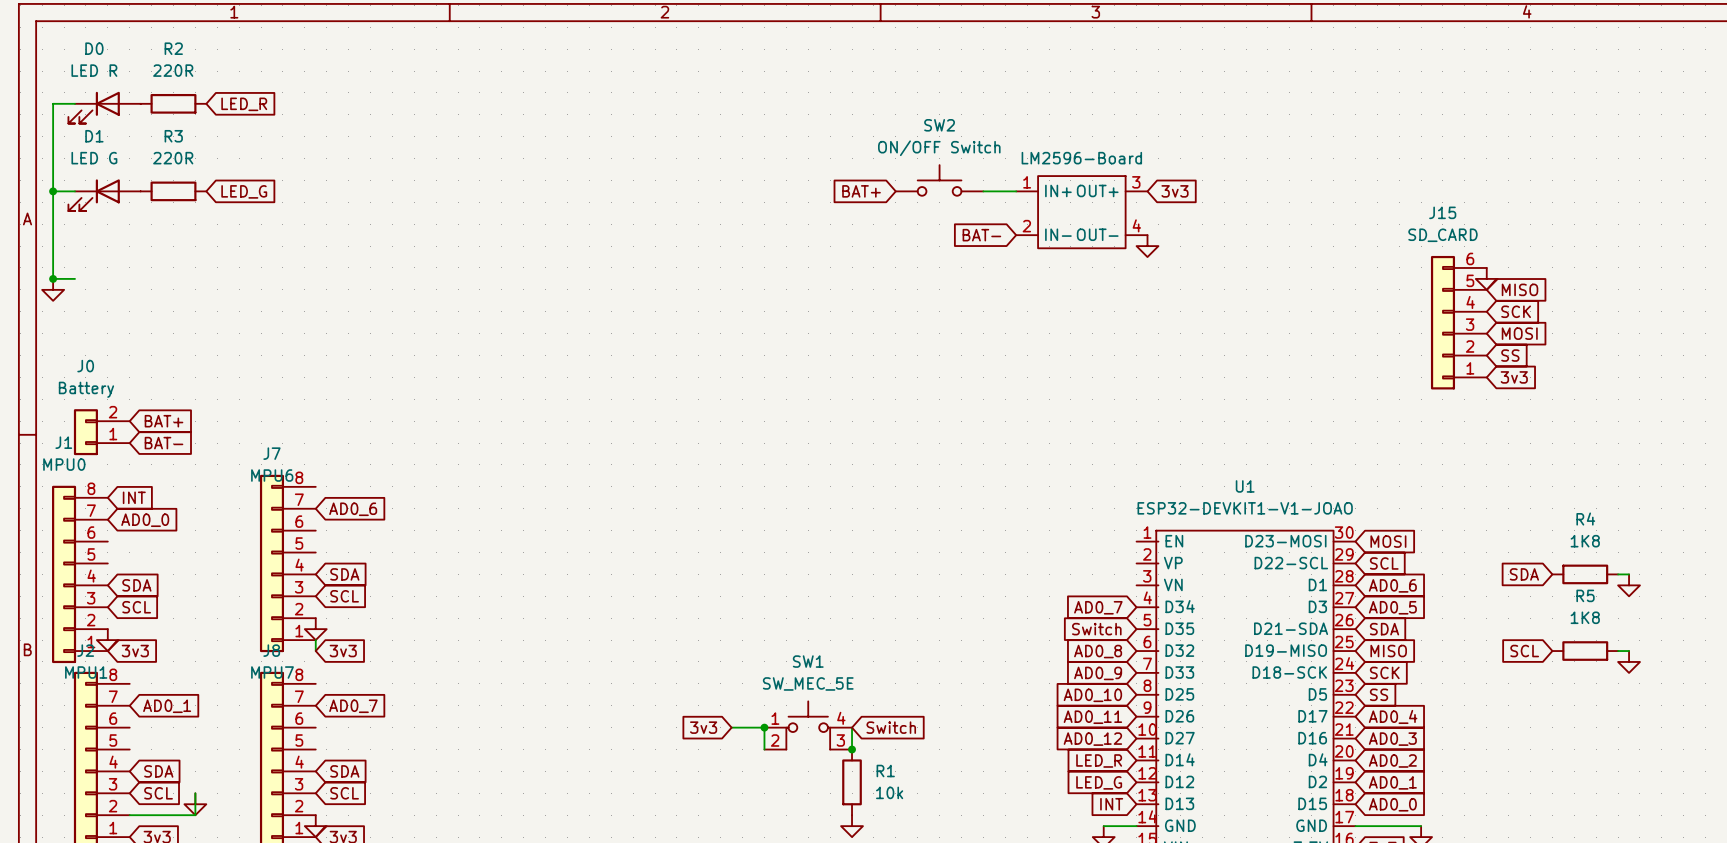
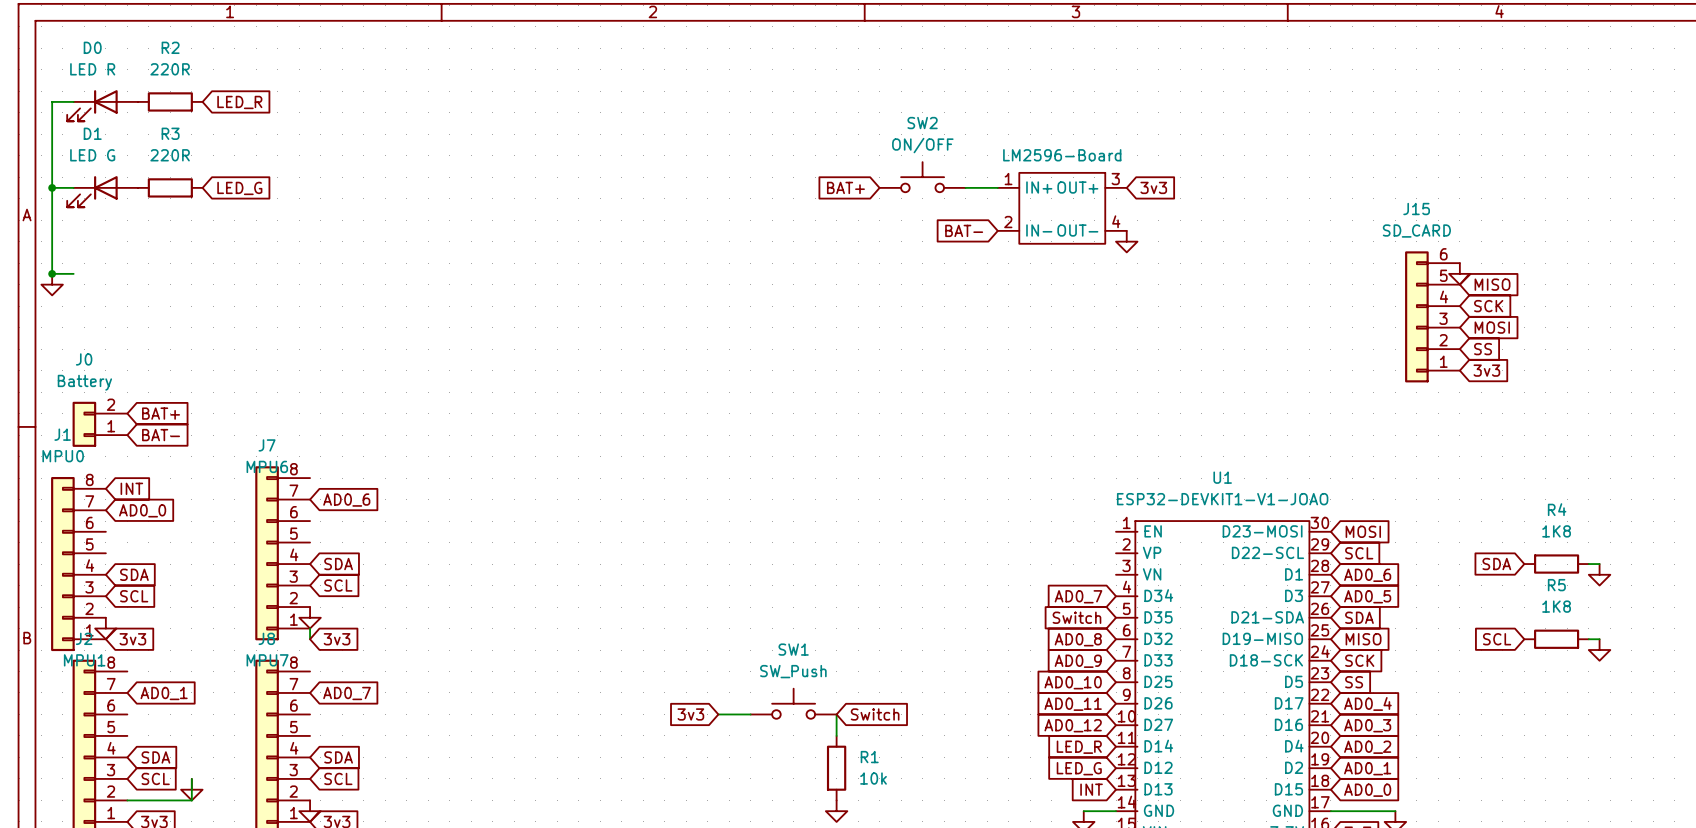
SW2 value: ON/OFF Switch (939, 148) -> ON/OFF (922, 145)
SW1 value: SW_MEC_5E (808, 683) -> SW_Push (793, 671)
SW1 symbol: [764, 701, 853, 750] -> [750, 688, 837, 719]
wire: (764, 727) (764, 749) -> none
junction: (764, 727) -> none
junction: (852, 749) -> none

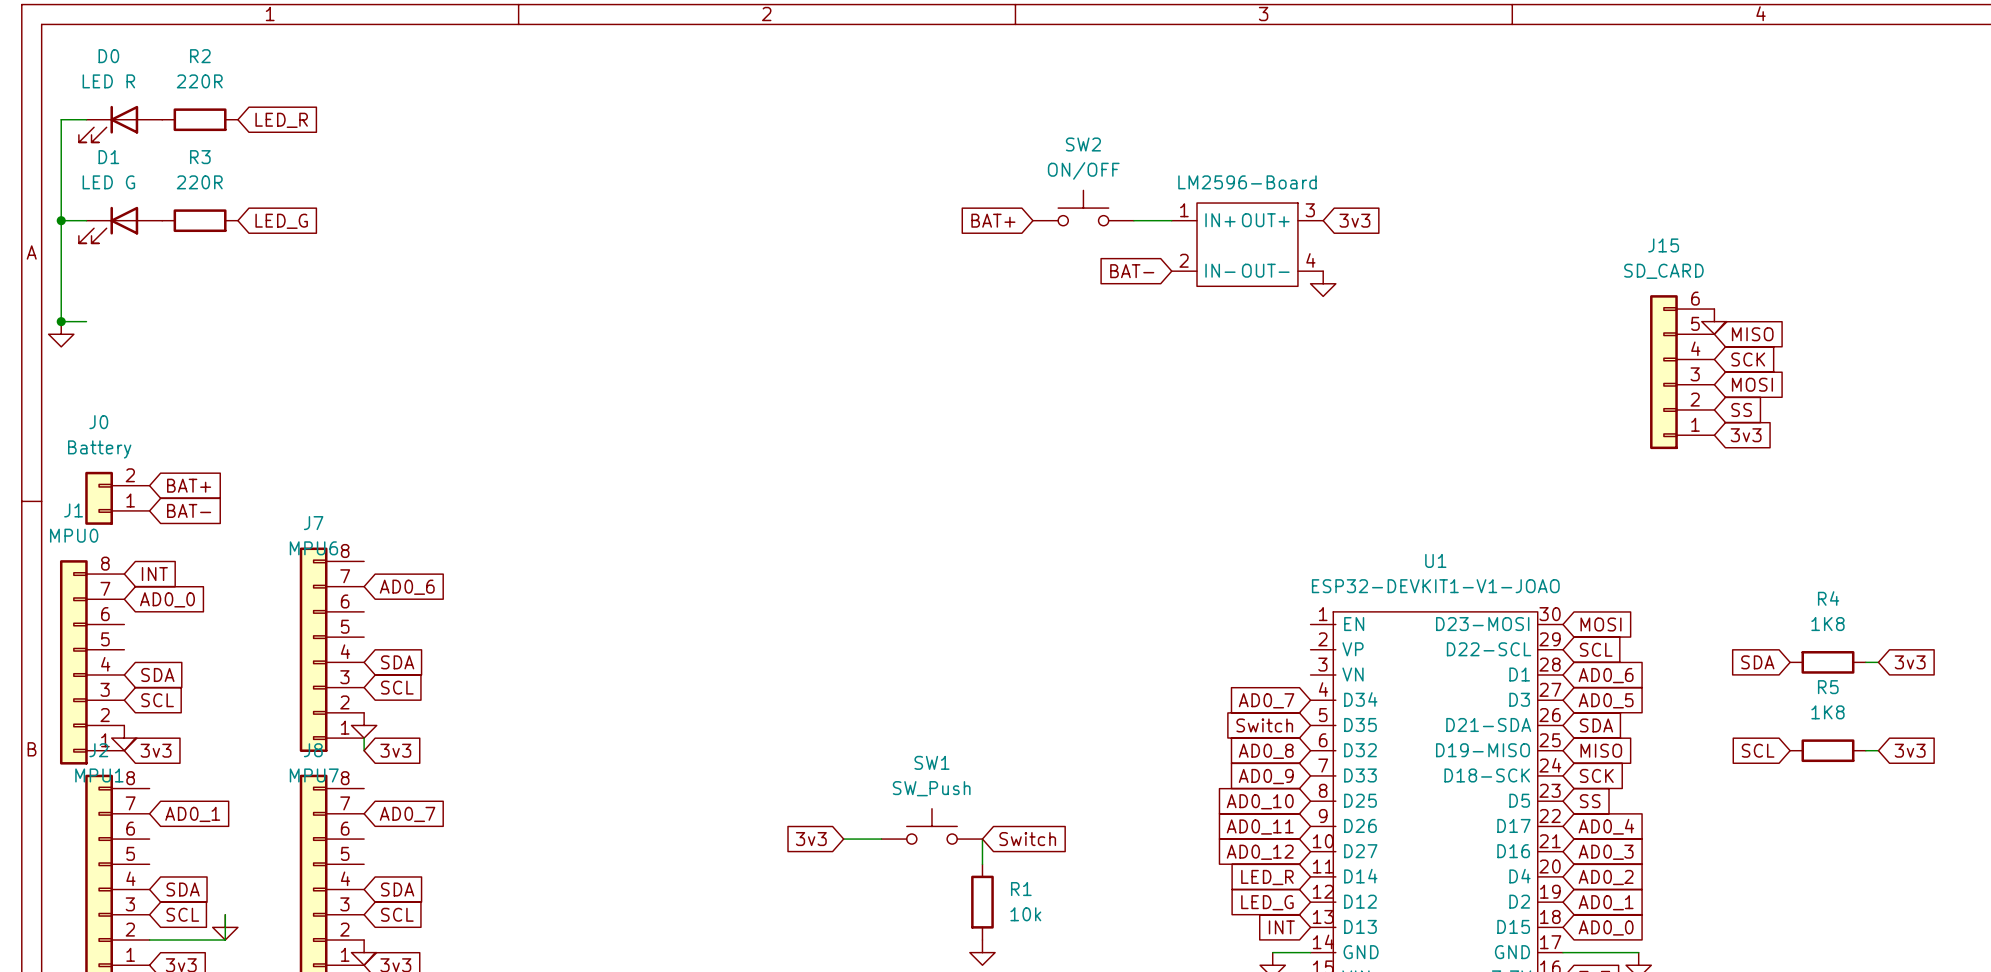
global label: none -> 3v3 (1910, 662)
power symbol: (1599, 574) -> none
global label: none -> 3v3 (1910, 750)
power symbol: (1599, 650) -> none

